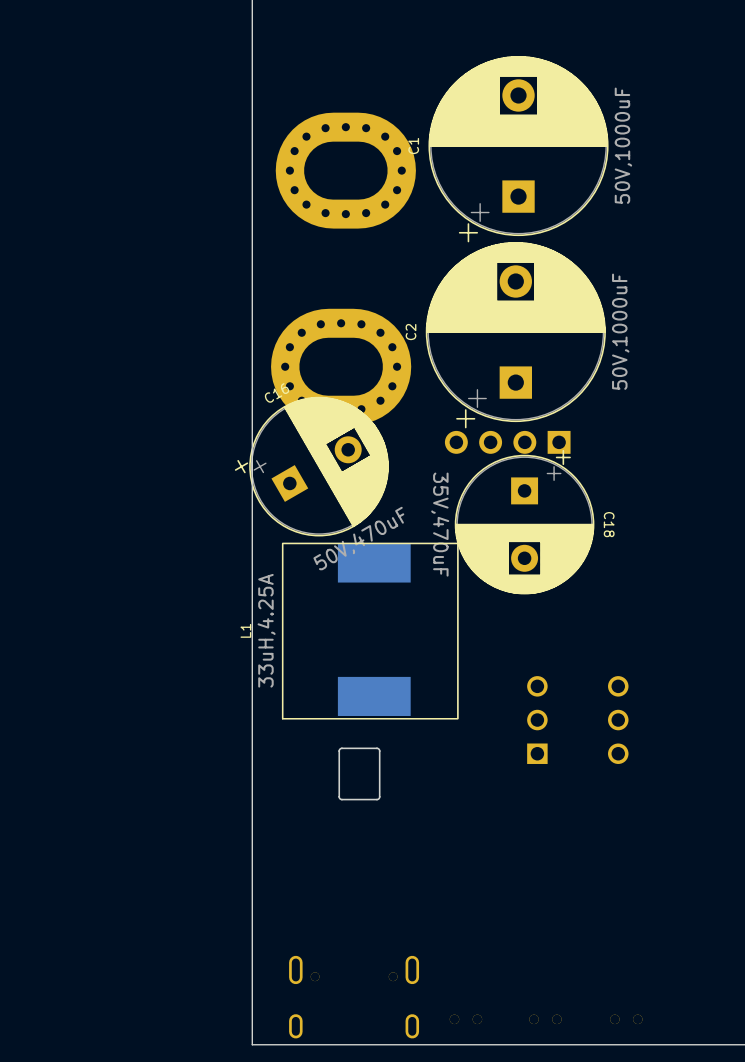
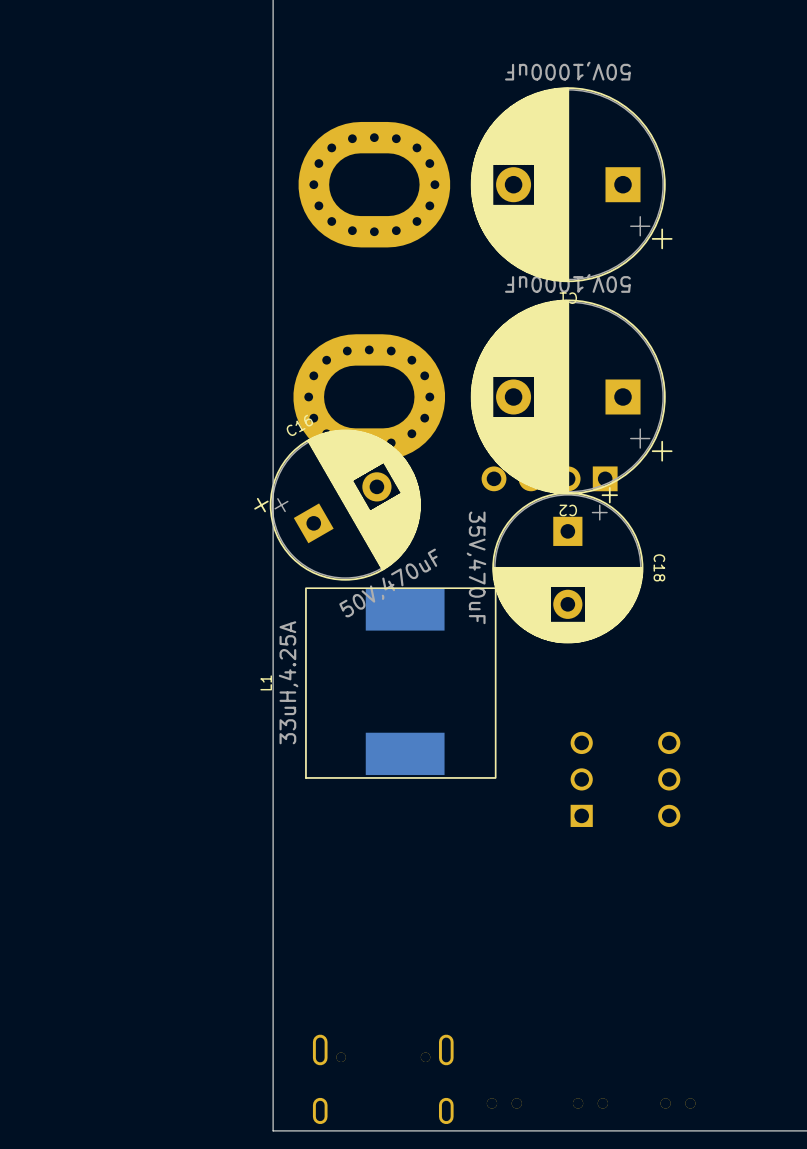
C1 rotation: 0° (518, 149) -> 90° counterclockwise (571, 184)
C2 rotation: 0° (515, 335) -> 90° counterclockwise (571, 396)
part: (359, 773) -> none

